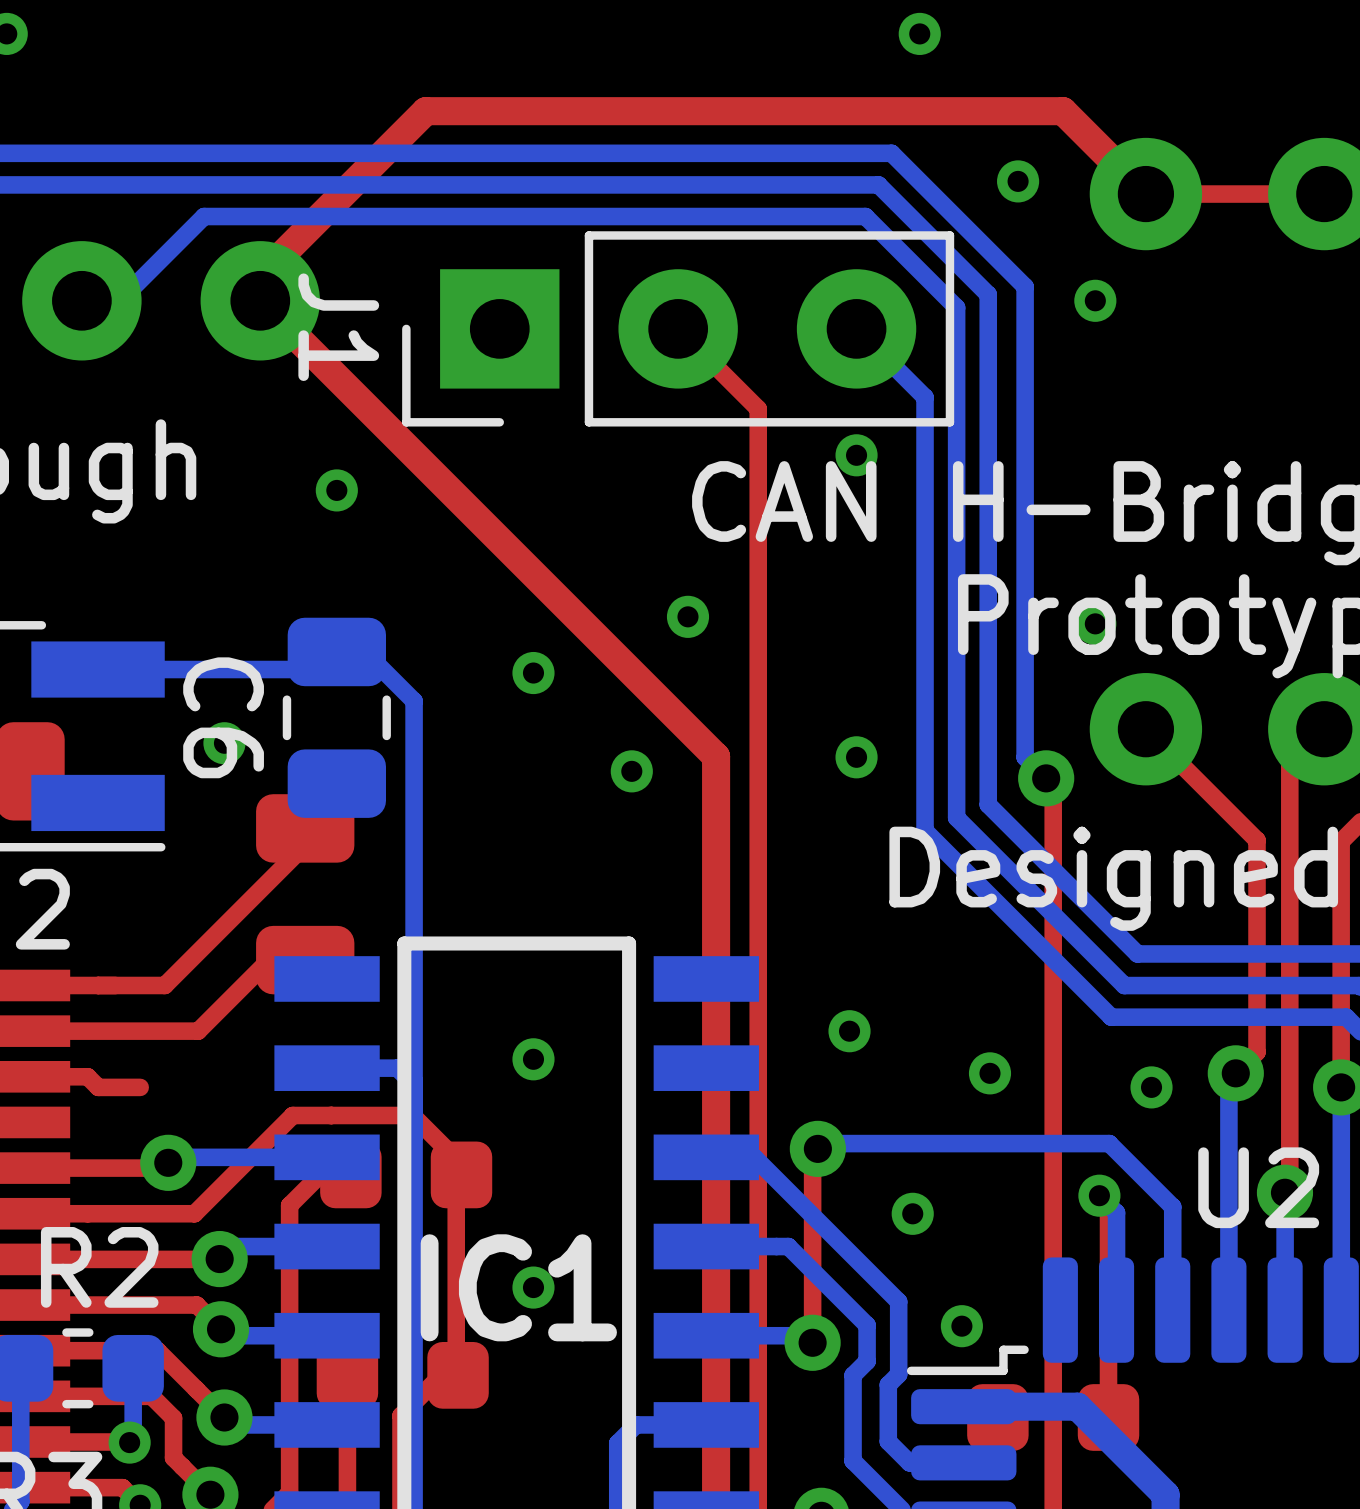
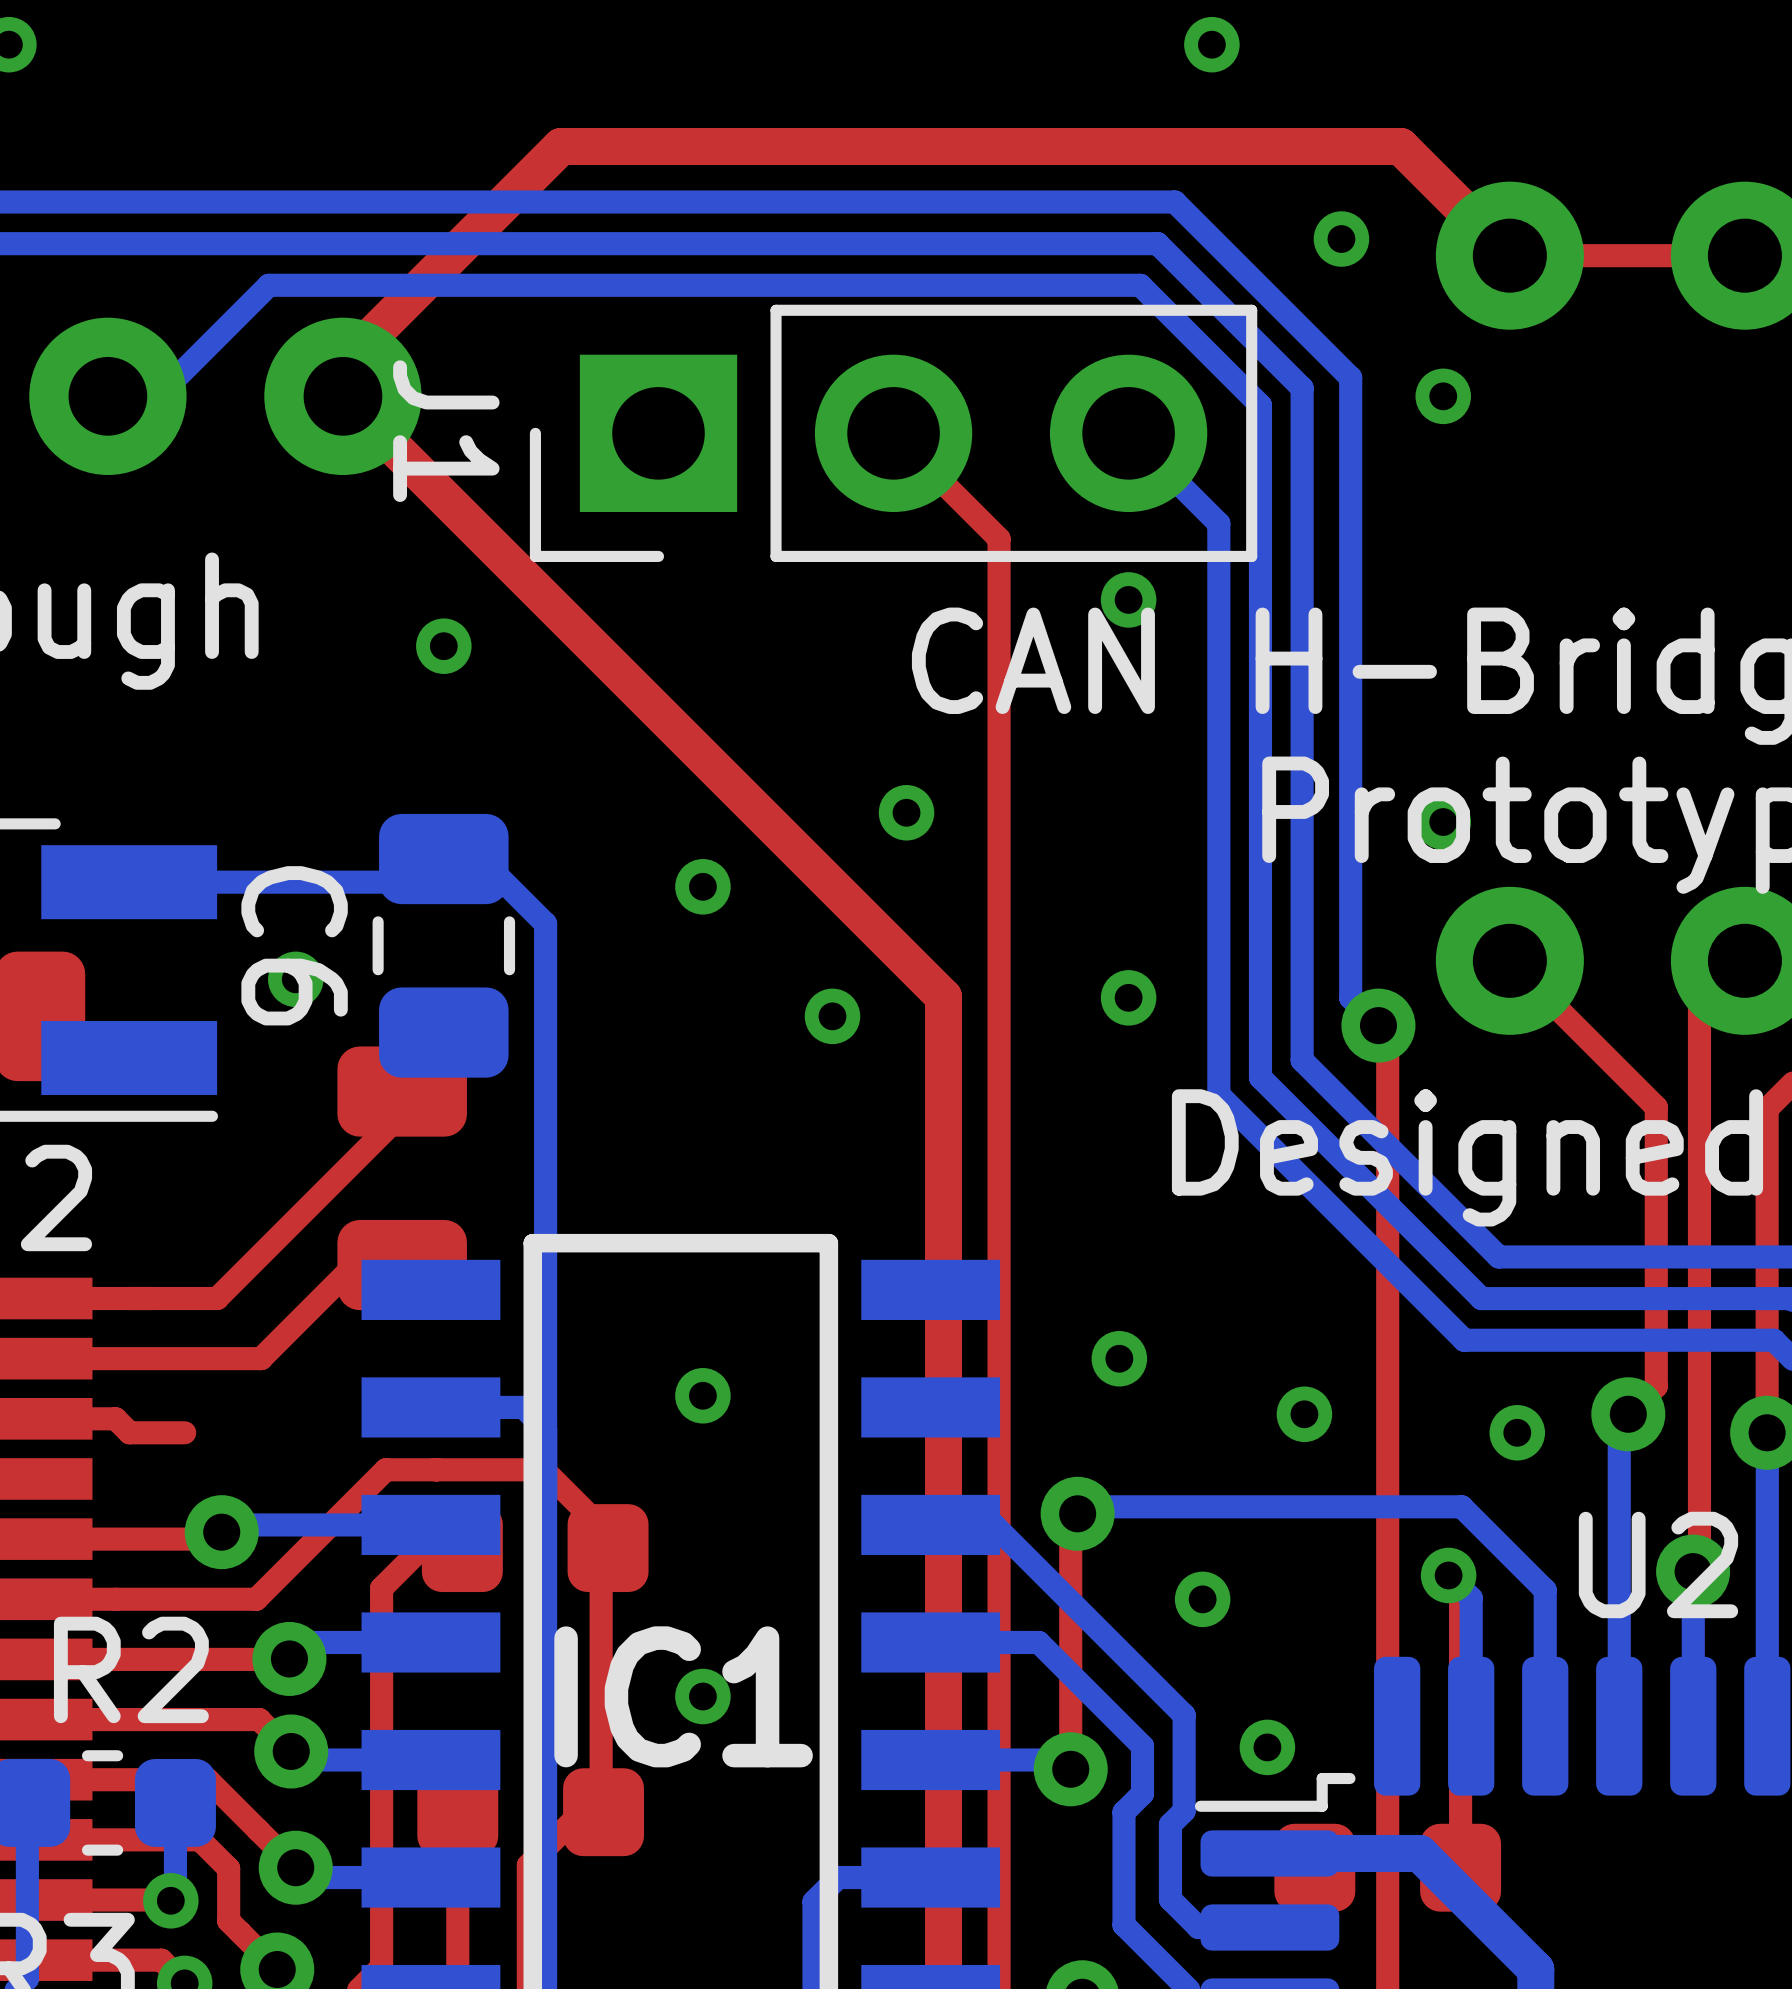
J1 footprint: [402, 231, 955, 427] -> [529, 304, 1258, 562]

